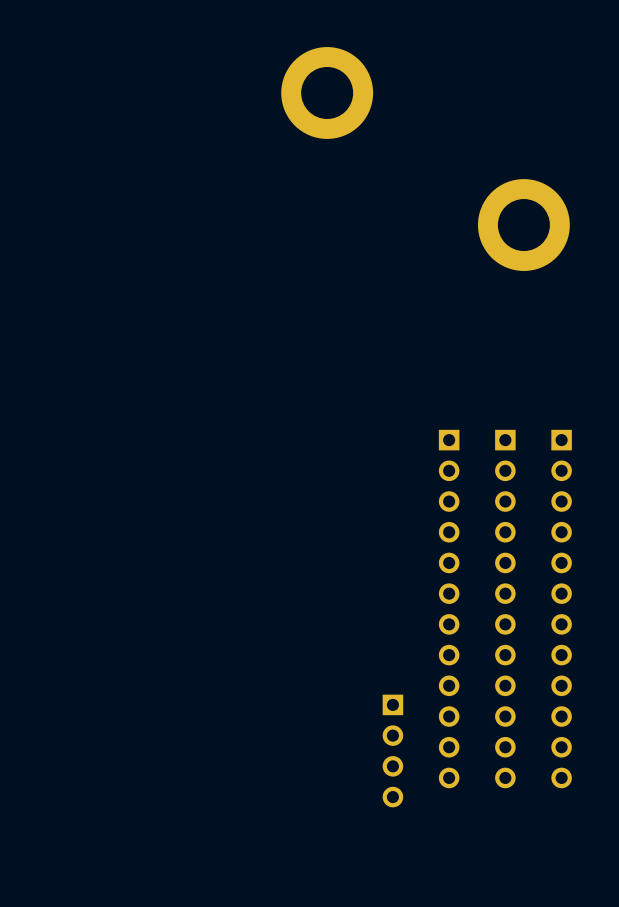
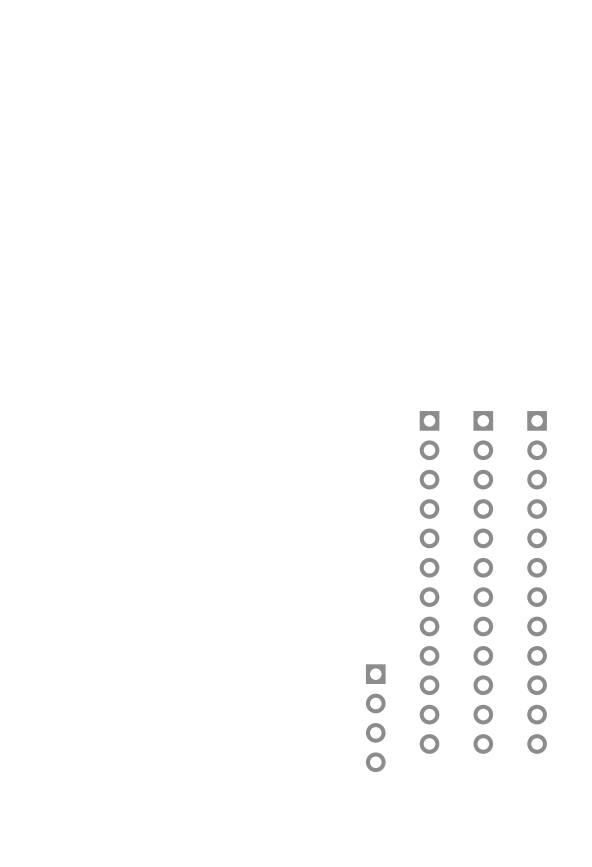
part: (327, 92) -> none
part: (523, 225) -> none

